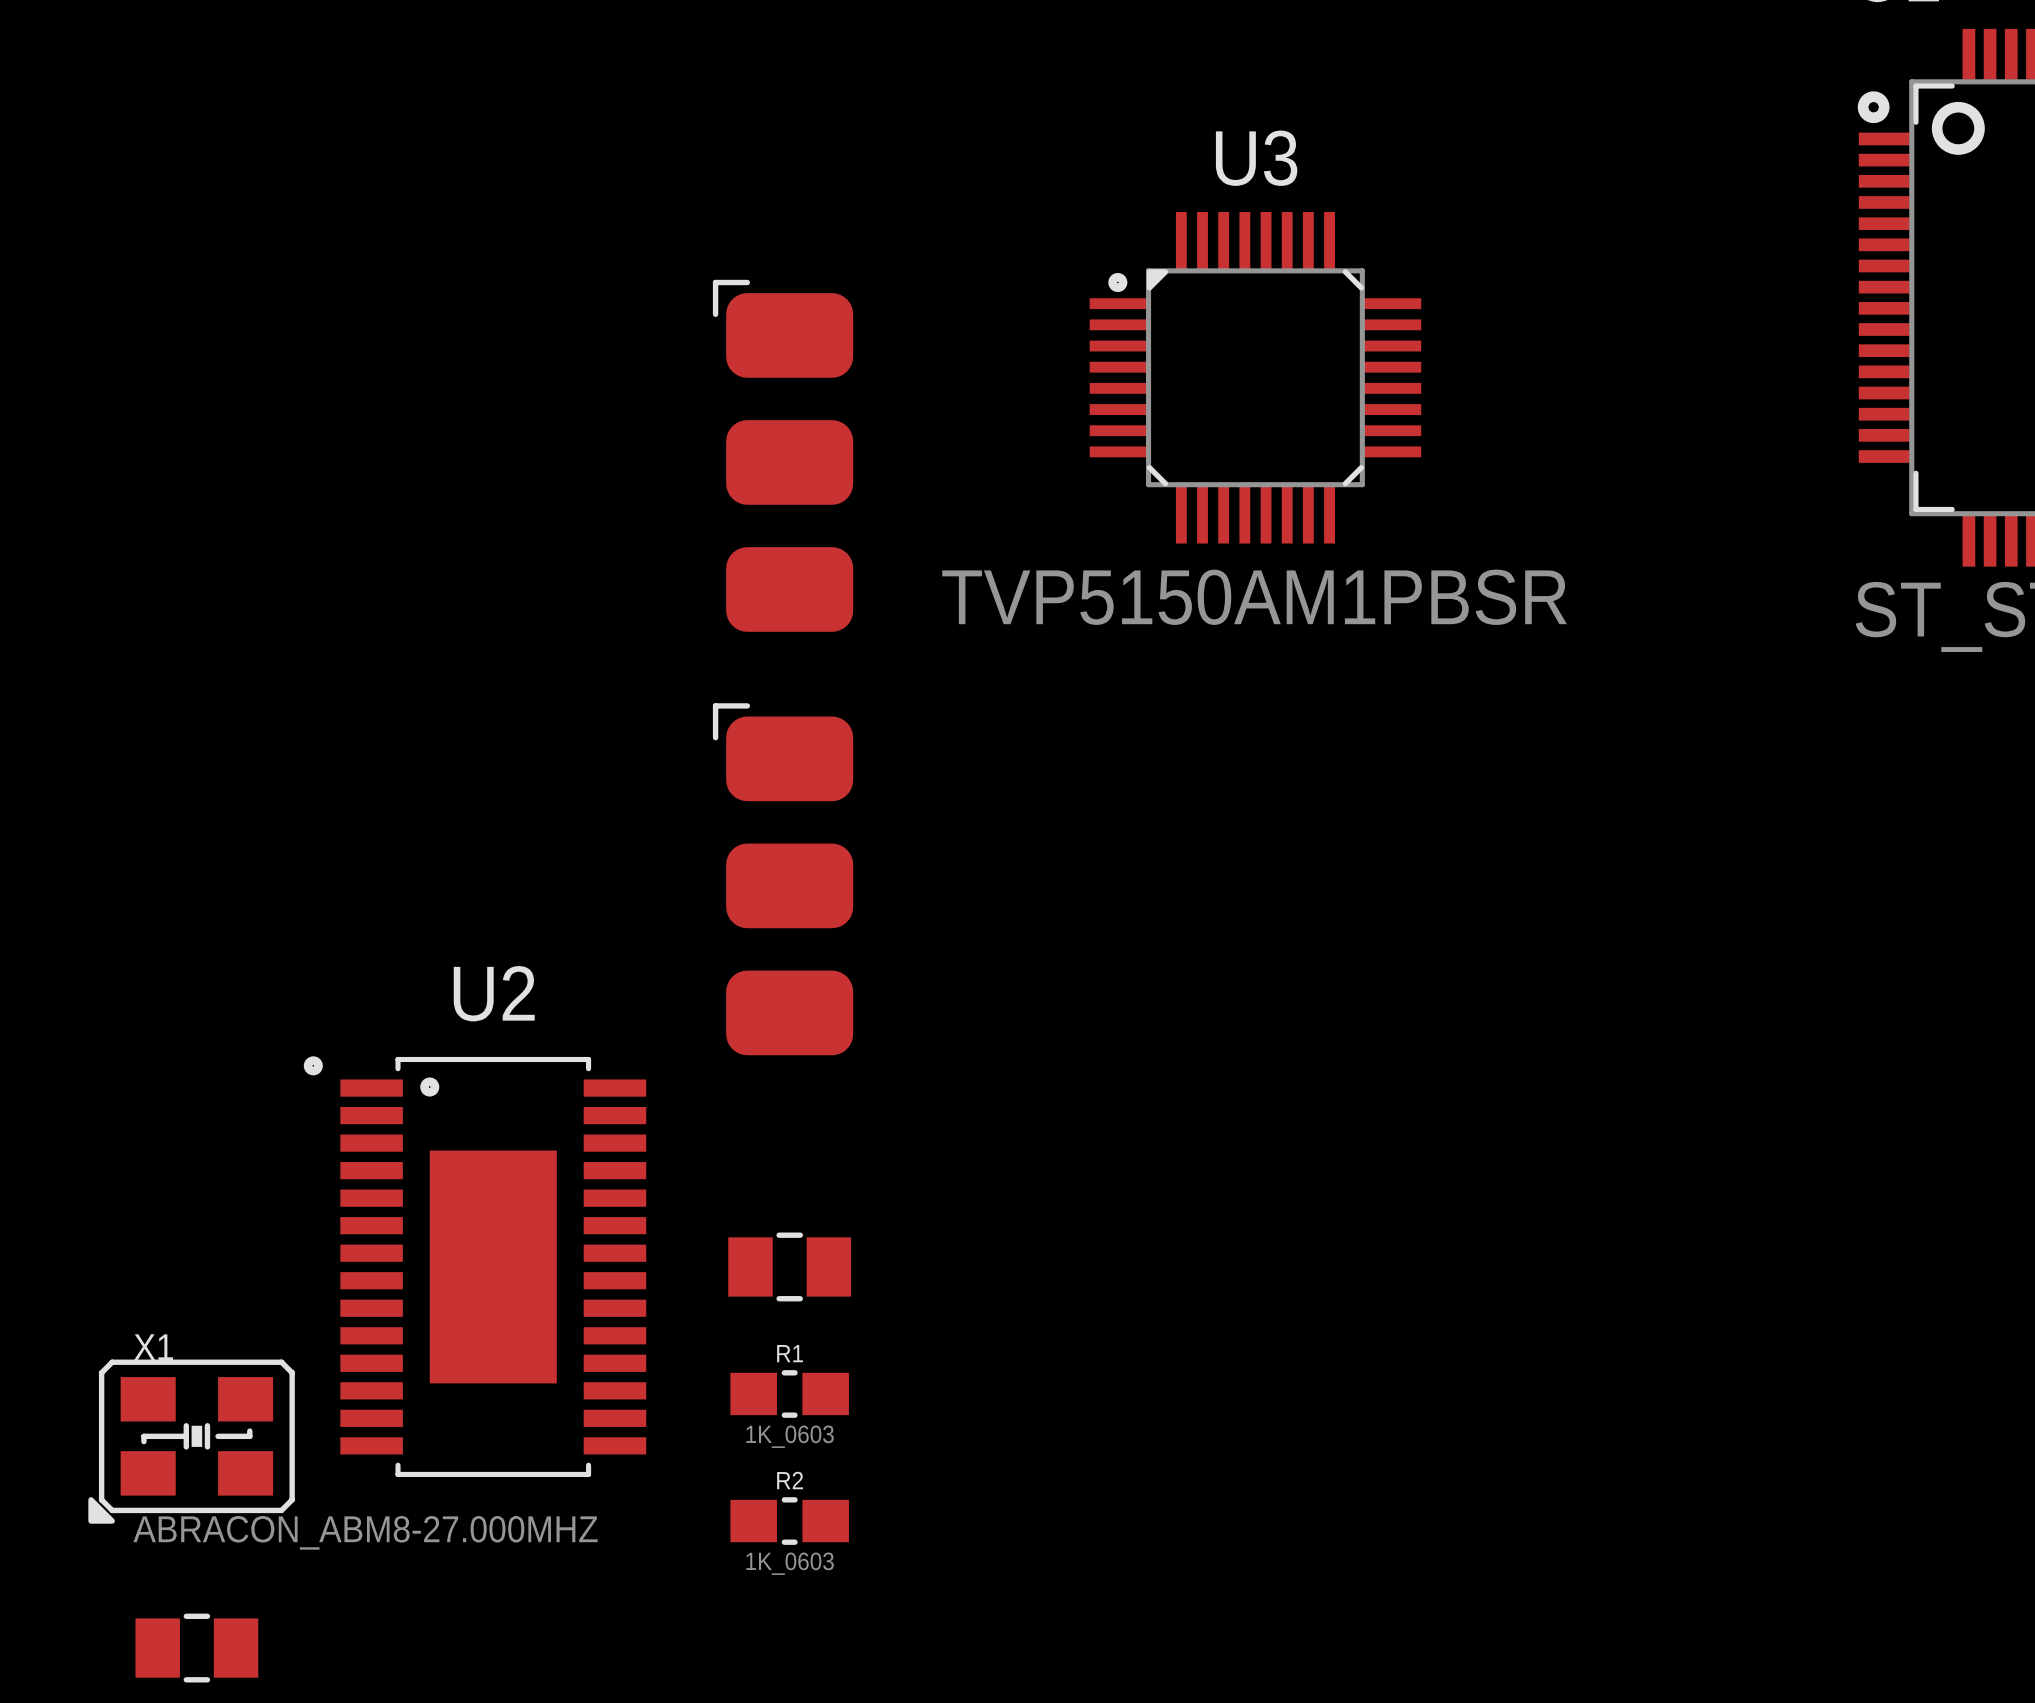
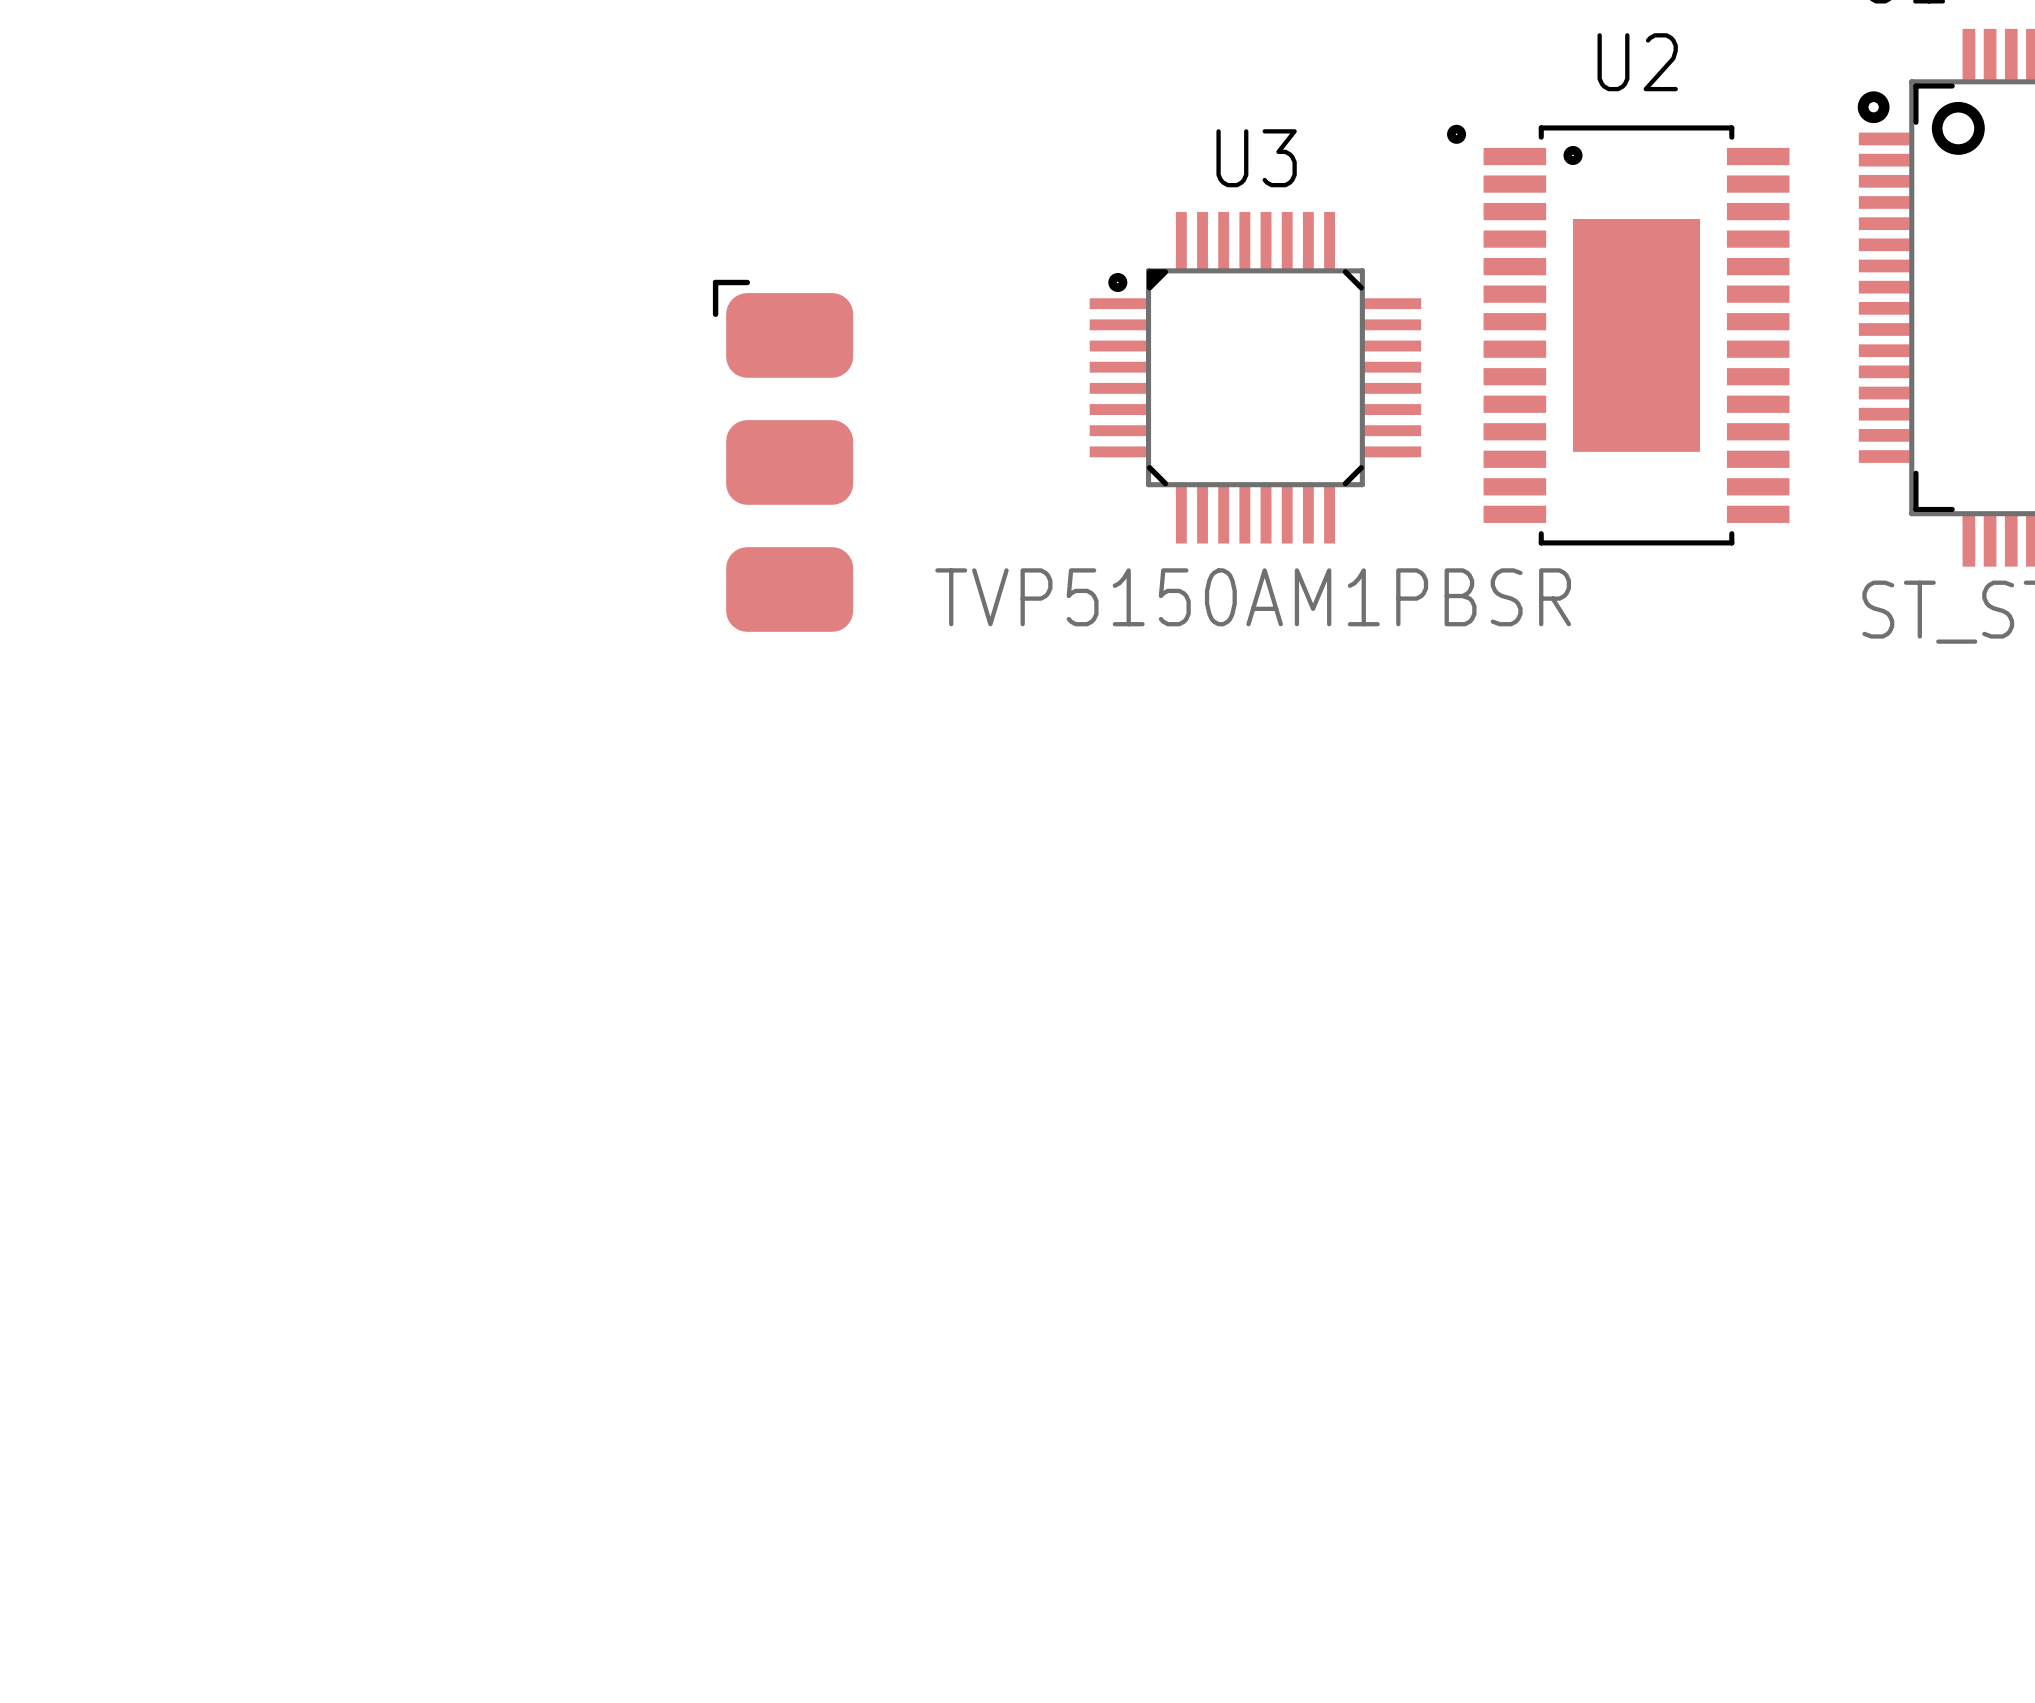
part: (783, 879) -> none
U2 position: (475, 1266) -> (1618, 335)
part: (789, 1266) -> none
R1: 1K_0603 (789, 1393) -> none
X1: ABRACON_ABM8-27.000MHZ (191, 1441) -> none
R2: 1K_0603 (789, 1521) -> none
part: (196, 1648) -> none

